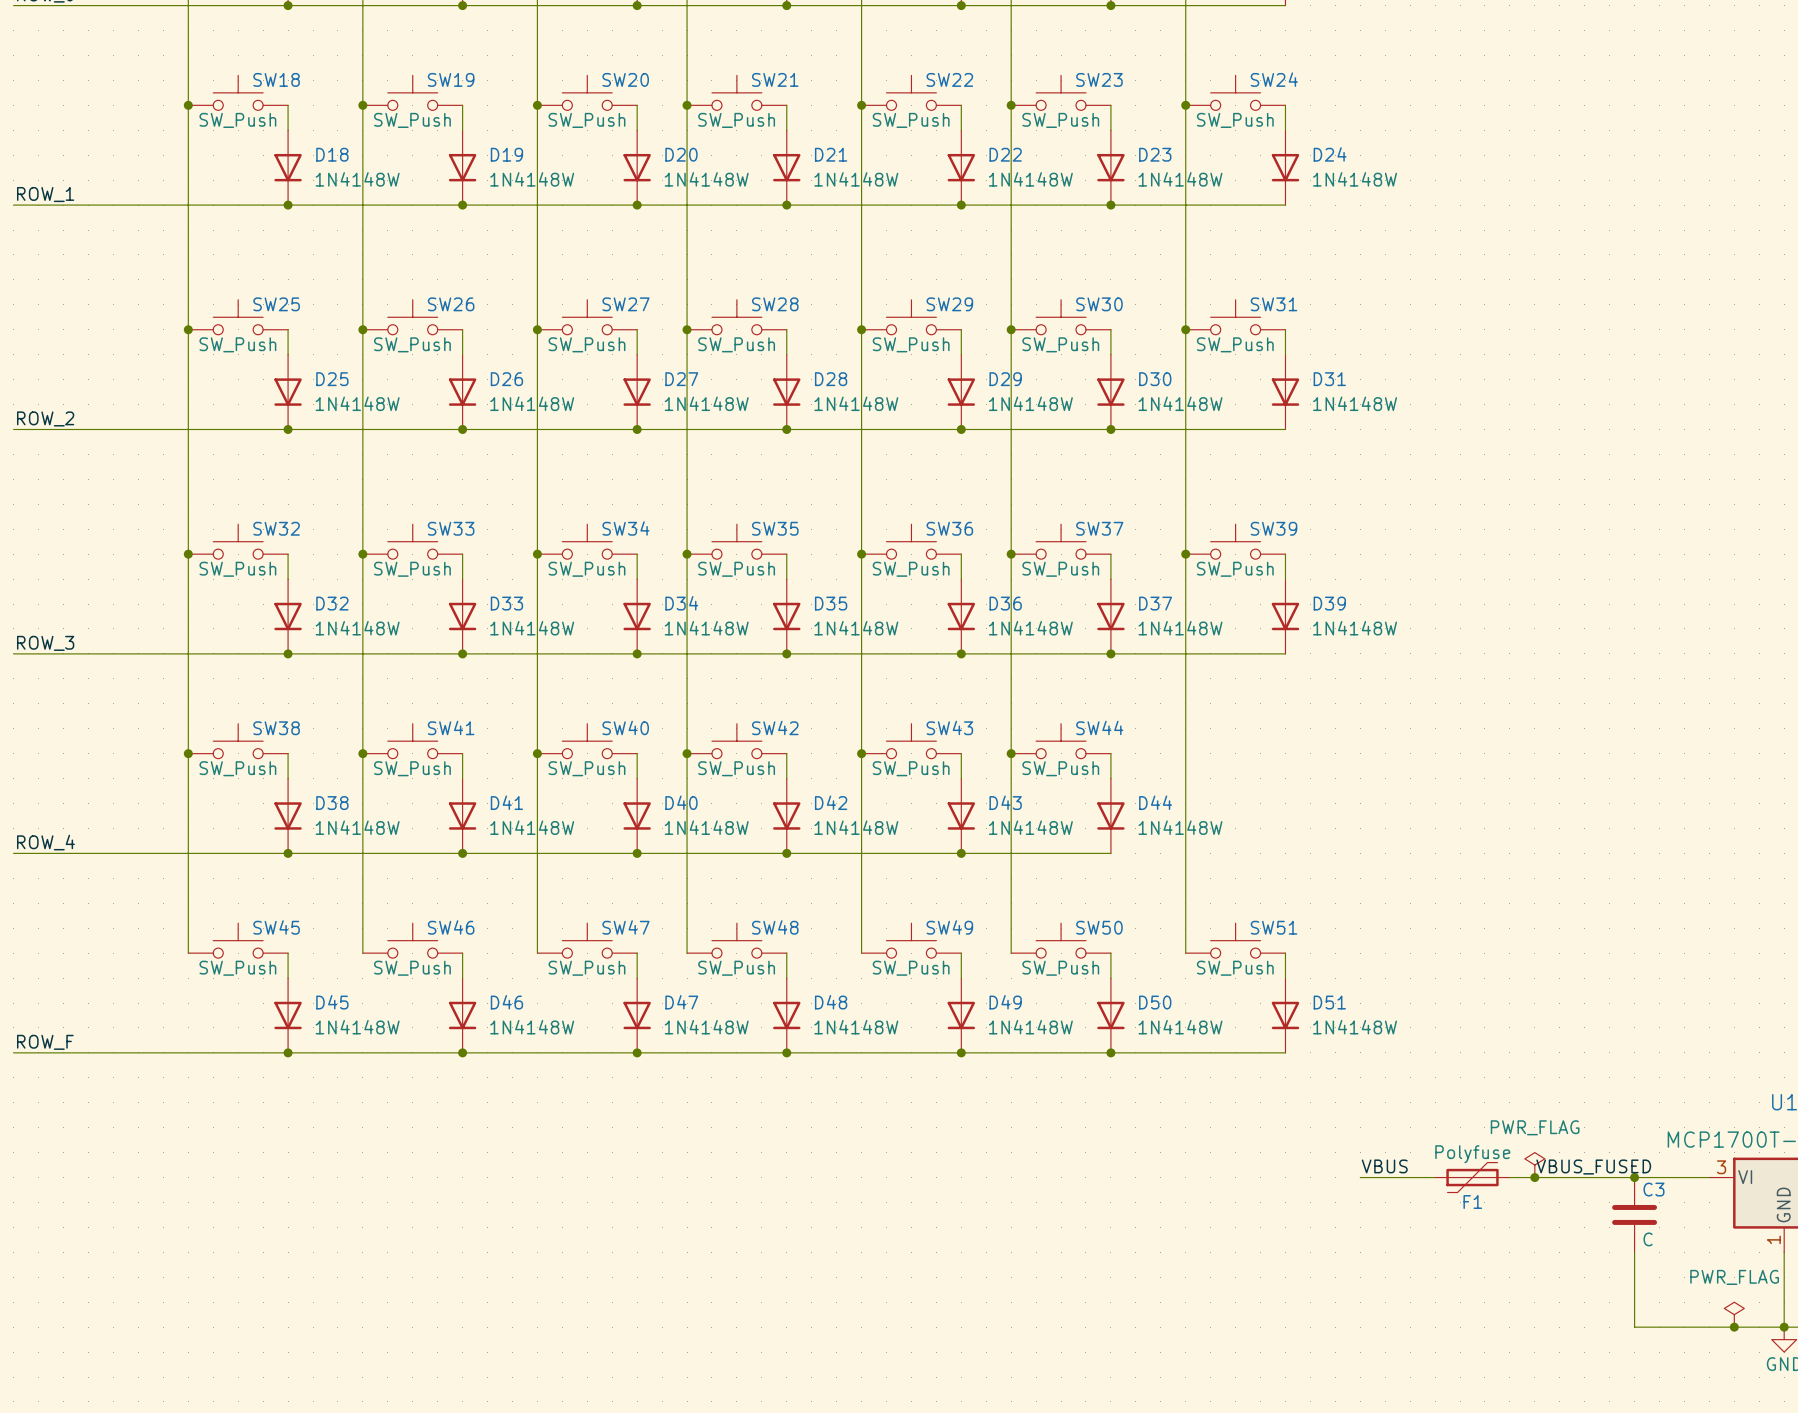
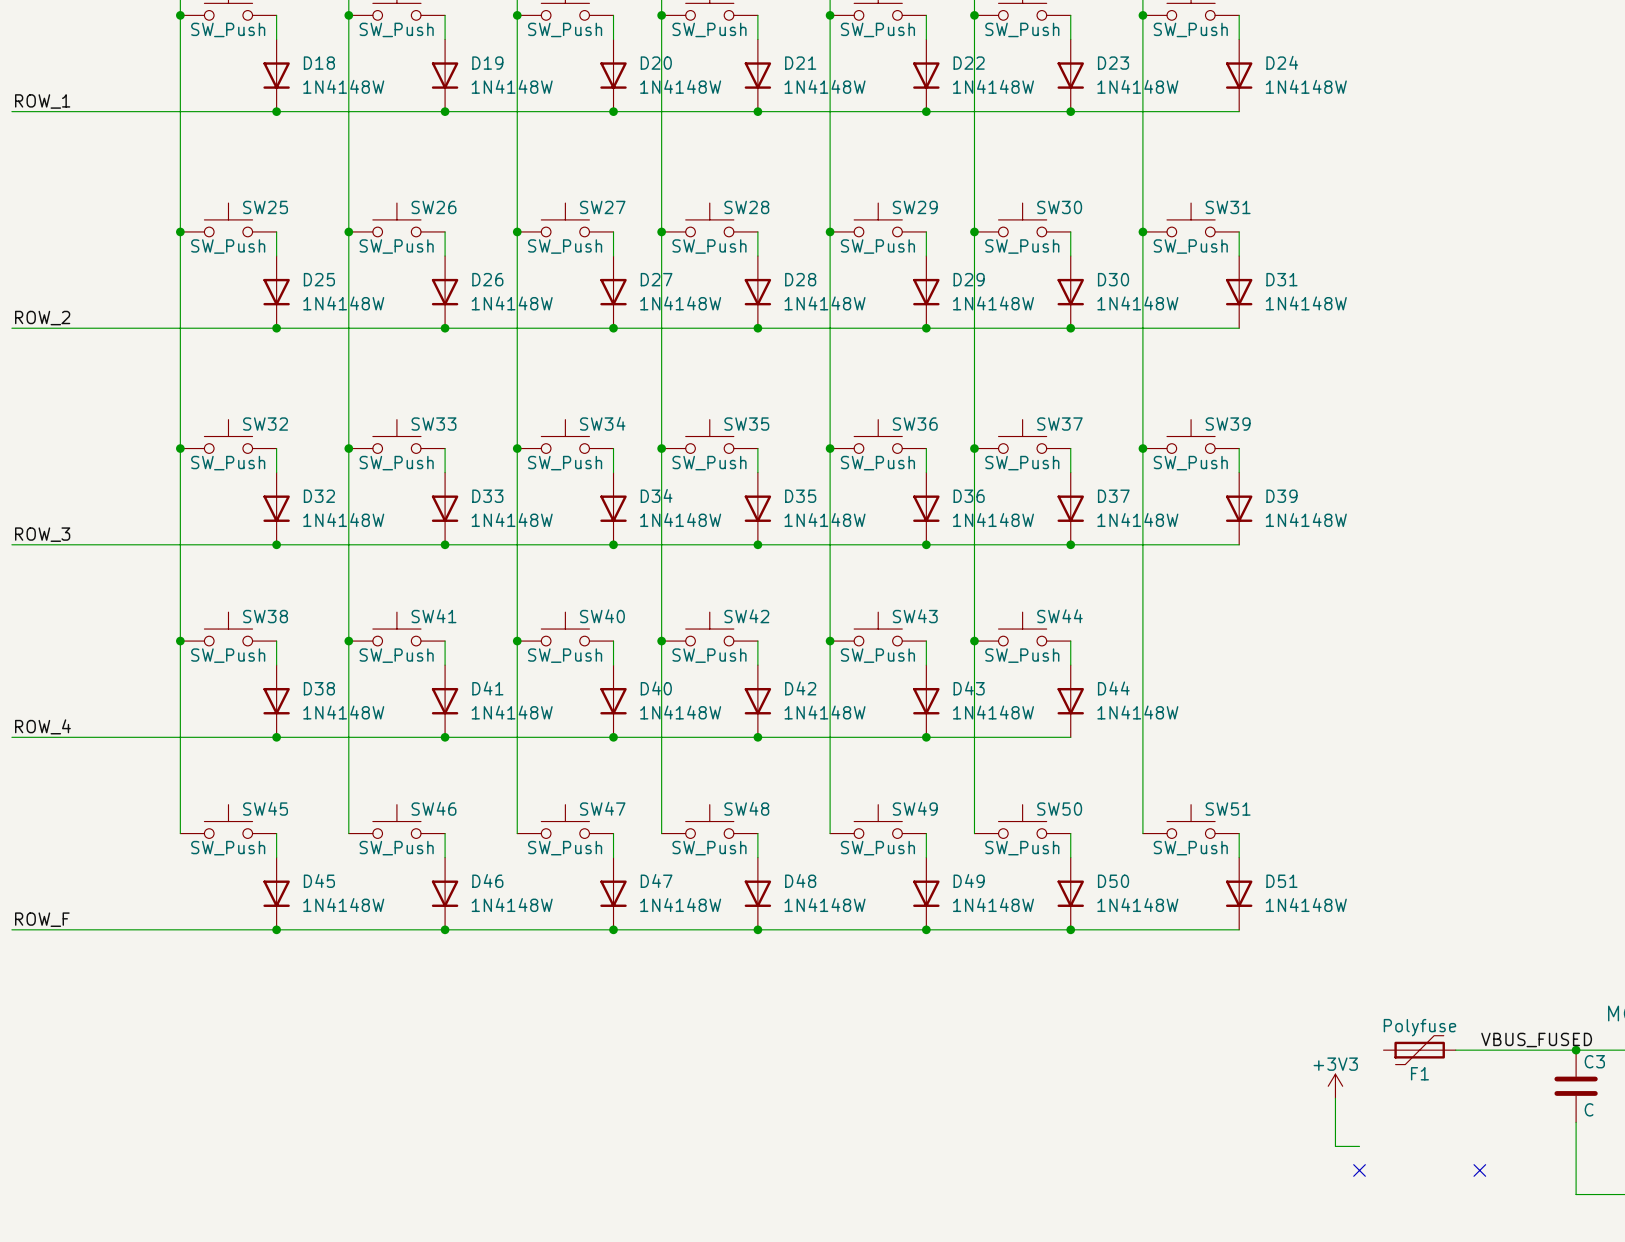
power symbol: PWR_FLAG (1534, 1165) -> none
label: VBUS (1384, 1166) -> none
wire: (1360, 1177) (1435, 1177) -> none
junction: (1534, 1177) -> none
power symbol: none -> +3V3 (1335, 1086)
wire: none -> (1335, 1098) (1335, 1146) (1359, 1146)
no-connect mark: none -> (1359, 1170)
no-connect mark: none -> (1479, 1170)

